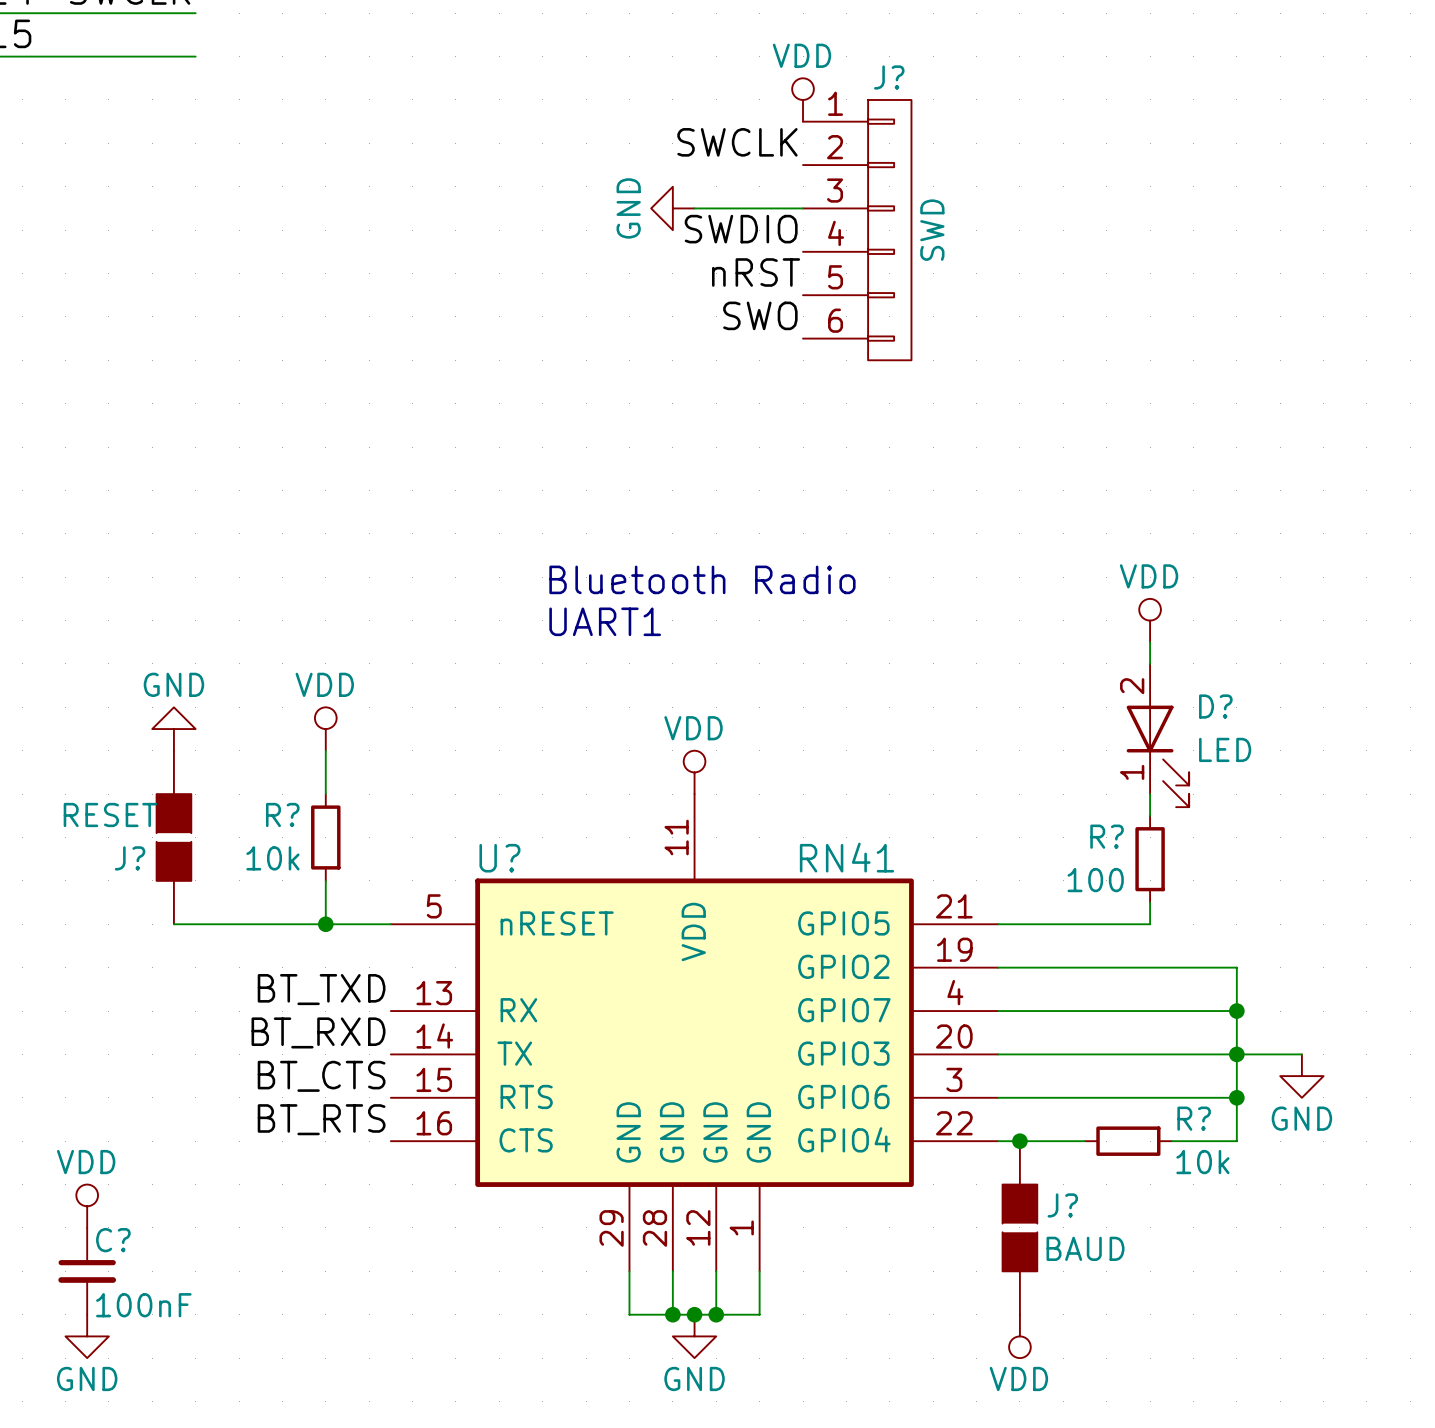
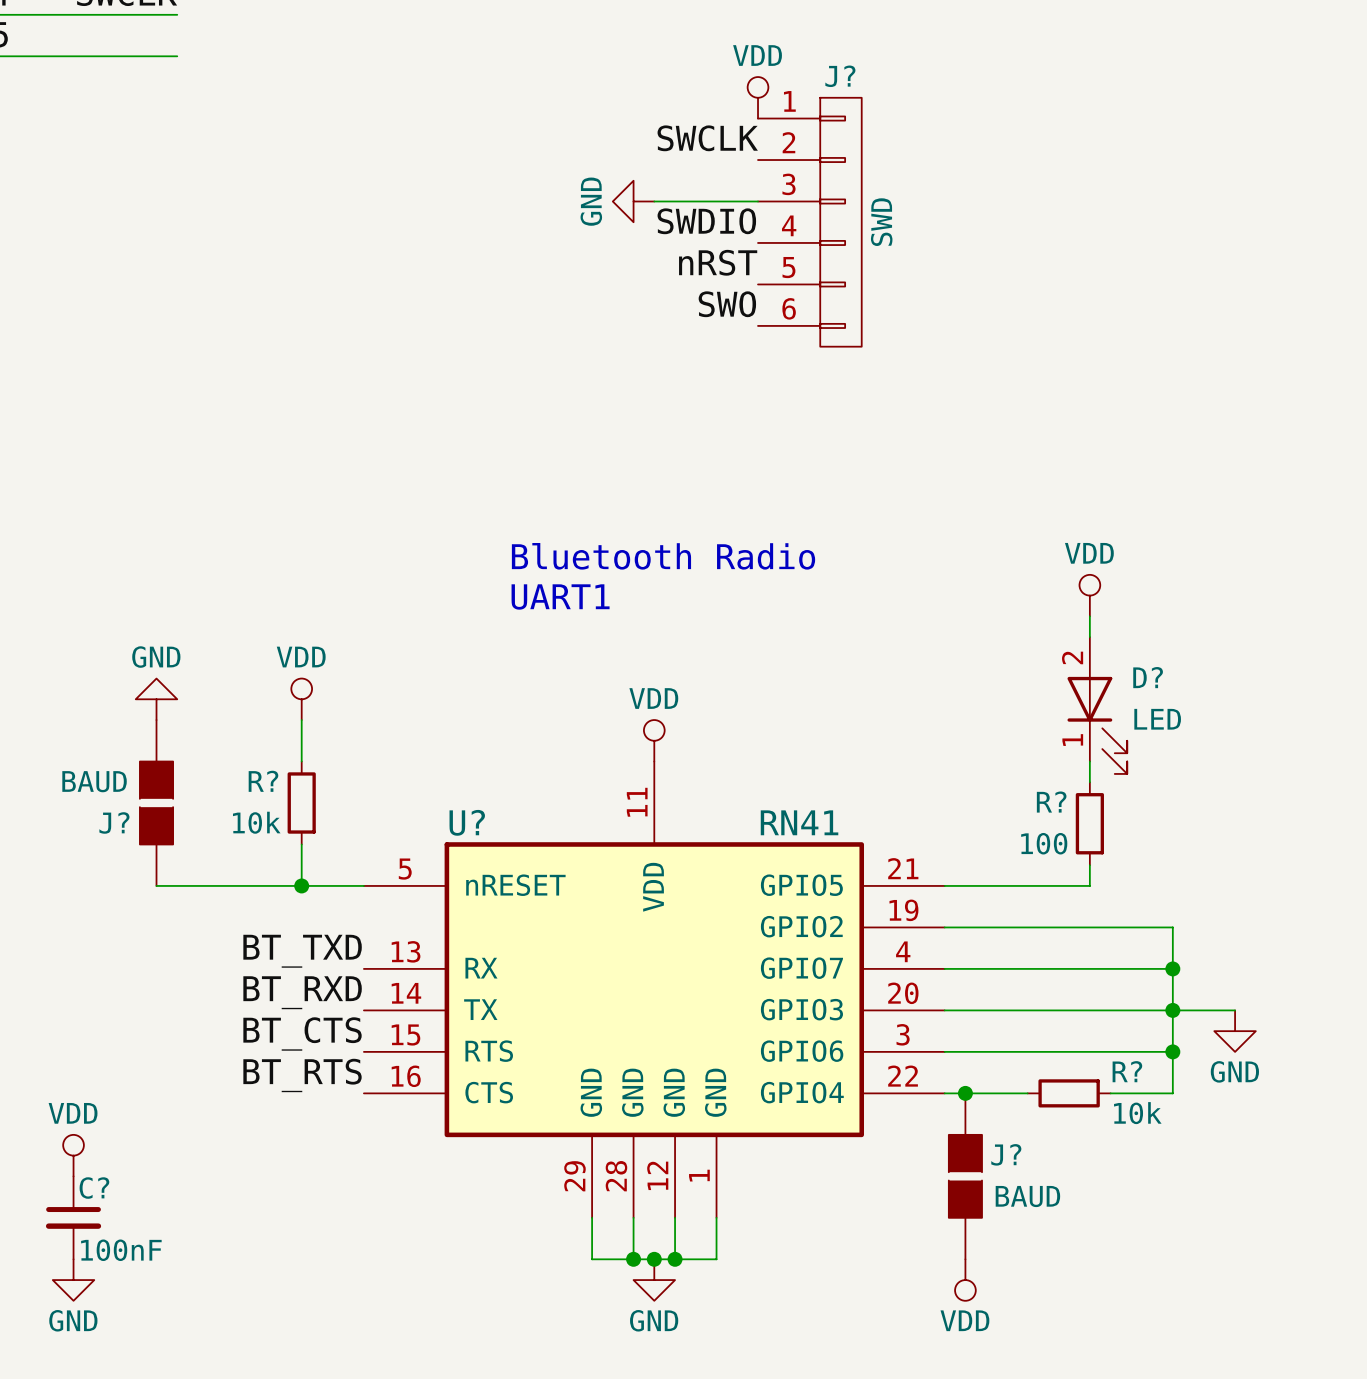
J? value: RESET (110, 814) -> BAUD (94, 781)

